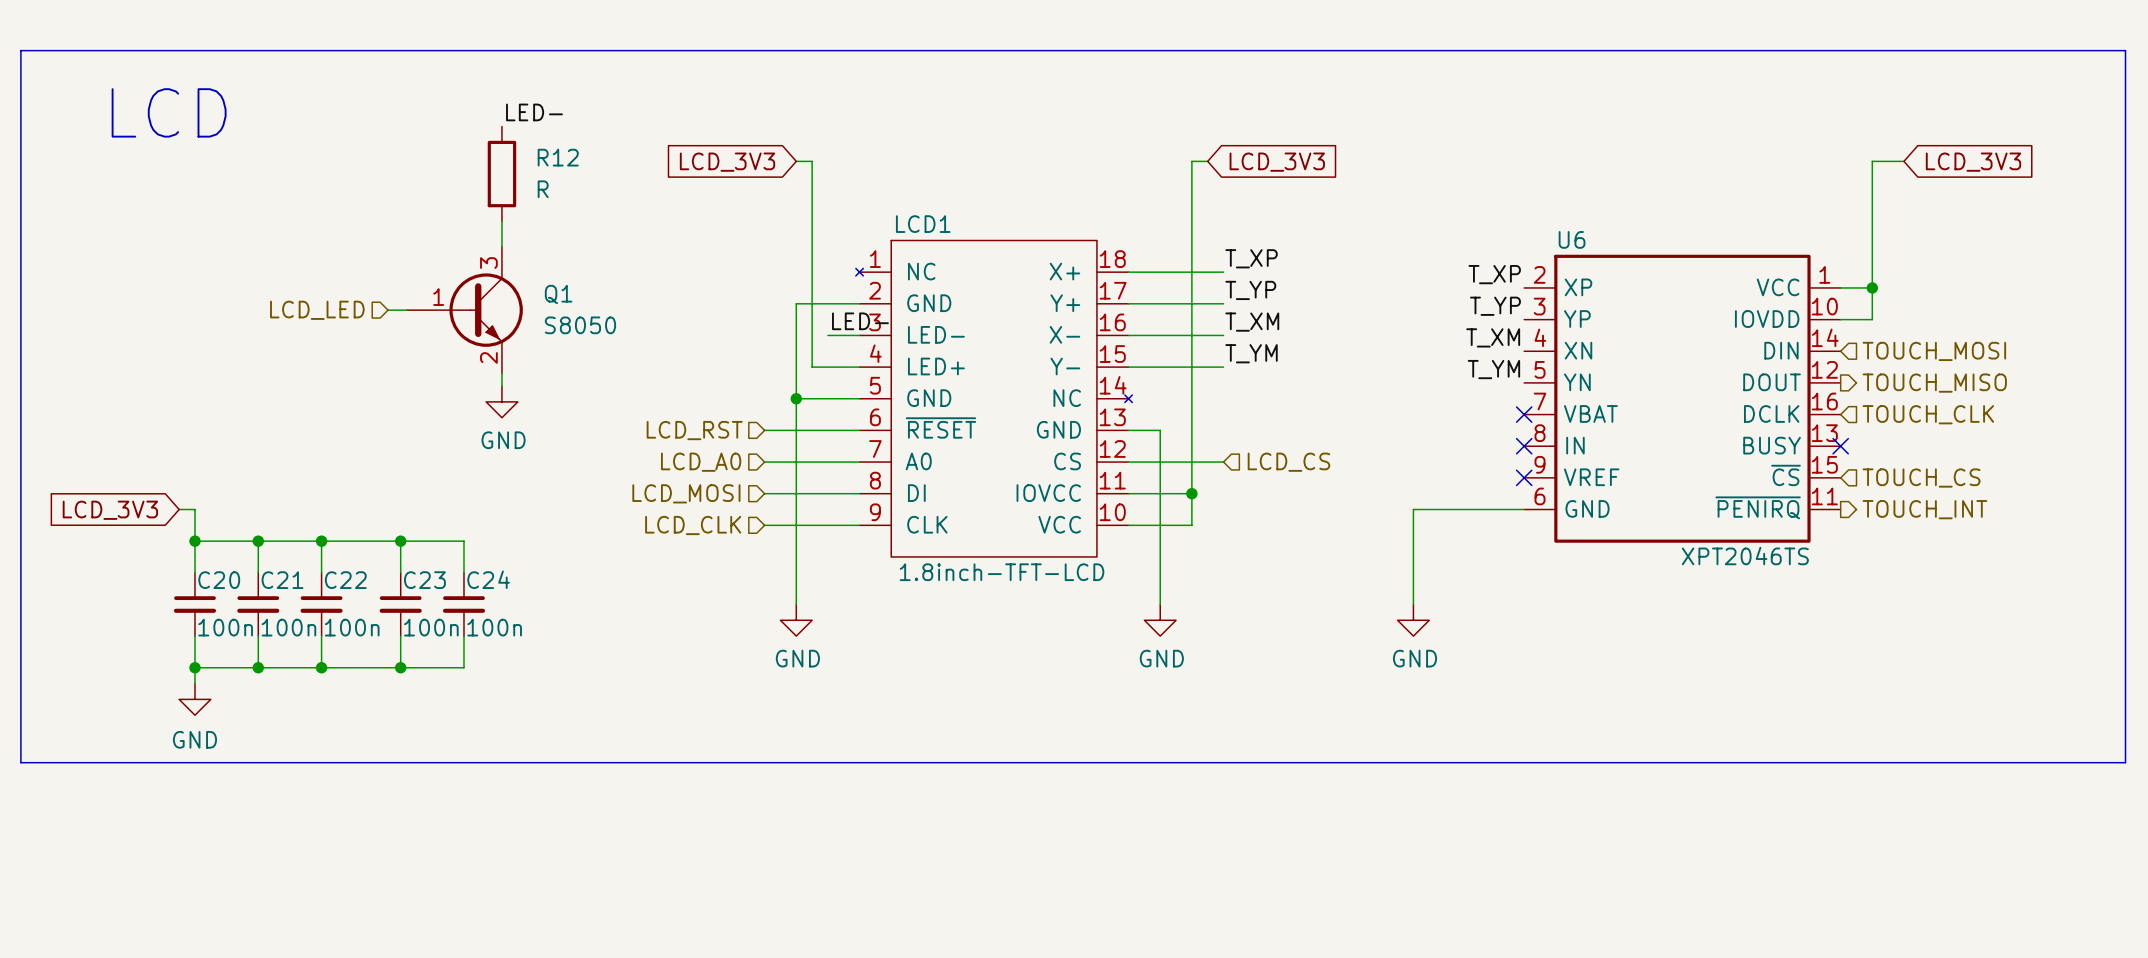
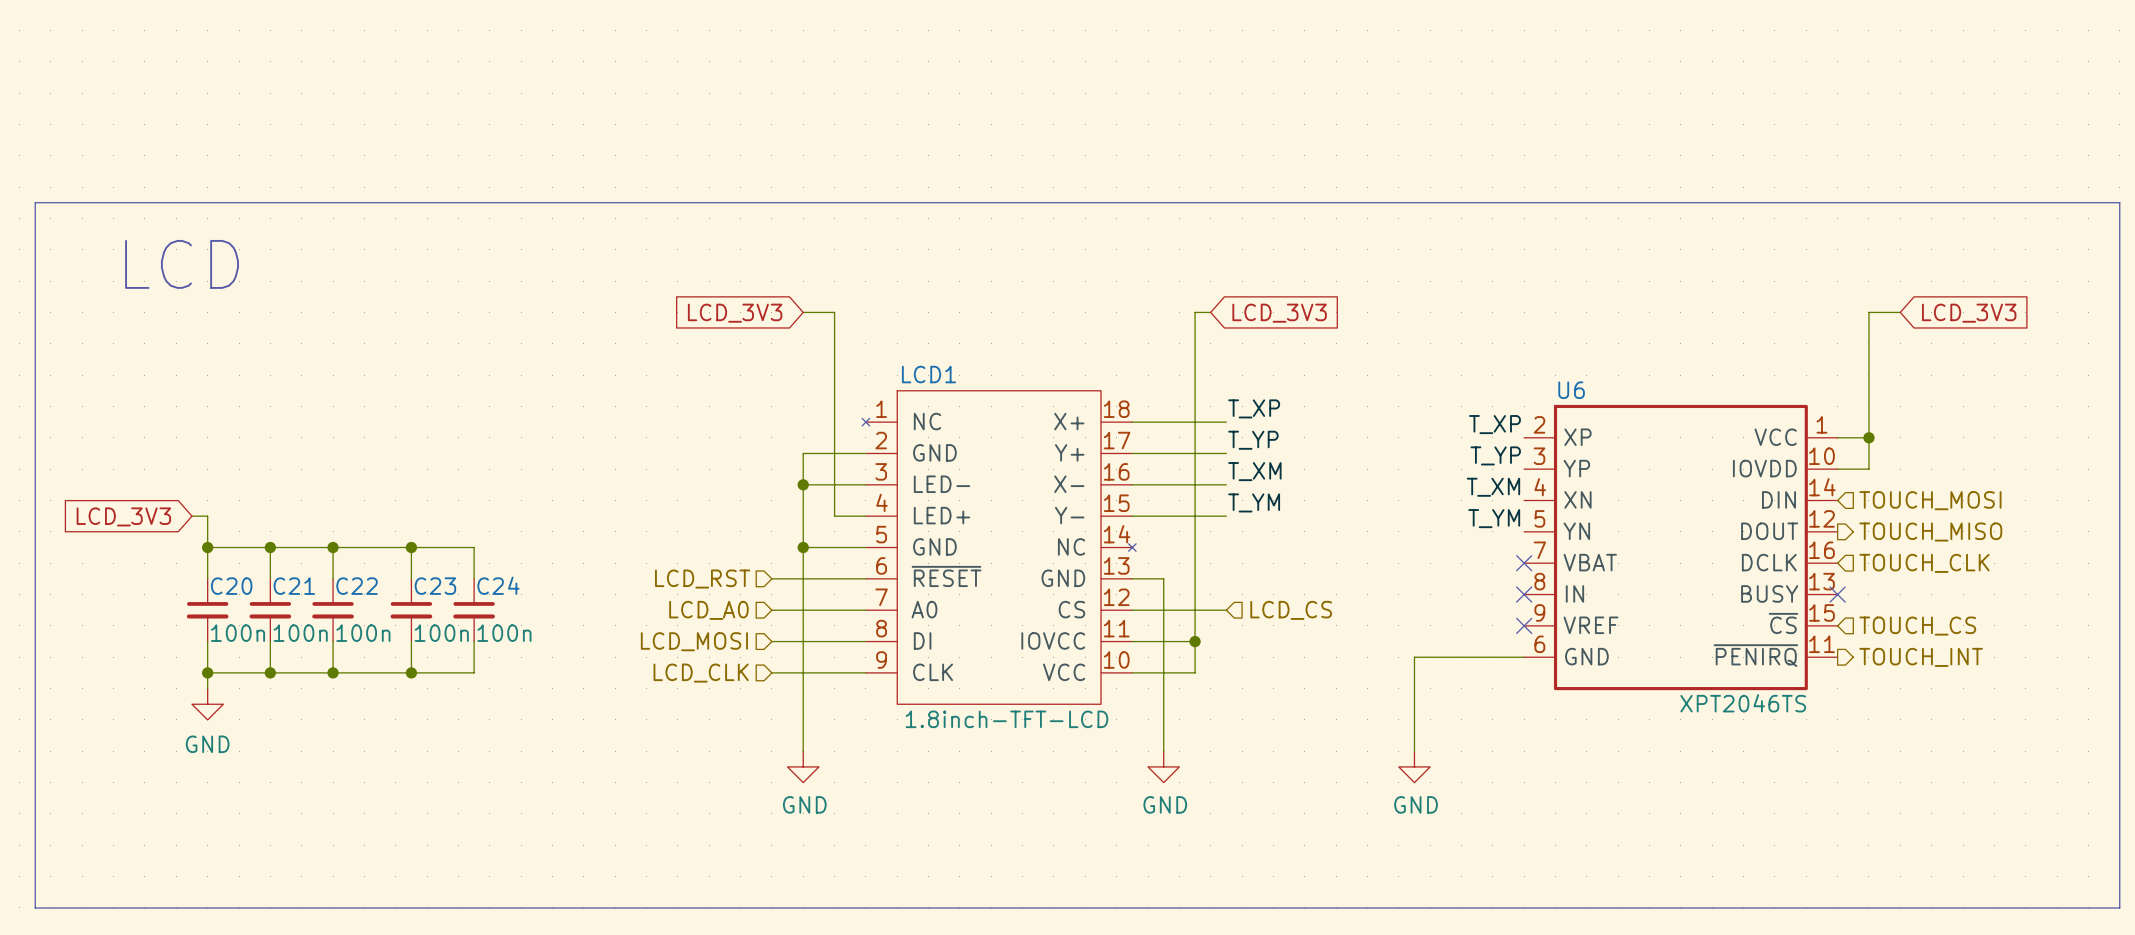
text position: LCD (169, 112) -> LCD (182, 264)
label: LED- (534, 112) -> none
wire: (796, 161) (812, 161) (812, 367) (859, 367) -> none
wire: (1207, 161) (1191, 161) (1191, 303) (1128, 303) -> none
wire: (1903, 161) (1872, 161) (1872, 303) -> (1900, 312) (1868, 312)
global label position: LCD_3V3 (727, 162) -> LCD_3V3 (735, 313)
global label position: LCD_3V3 (1277, 162) -> LCD_3V3 (1279, 313)
global label position: LCD_3V3 (1973, 162) -> LCD_3V3 (1969, 313)
R12: R (501, 174) -> none
line: (20, 193) (20, 50) (2125, 50) (2125, 193) -> (35, 202) (2119, 202)
wire: (501, 221) (501, 246) -> none
label position: T_XP (1251, 258) -> T_XP (1254, 408)
wire: (1128, 272) (1223, 272) -> (1132, 422) (1226, 422)
label position: T_XP (1494, 274) -> T_XP (1494, 424)
wire: (1840, 287) (1872, 287) -> (1837, 437) (1868, 437)
junction: (1872, 287) -> none
label position: T_YP (1250, 290) -> T_YP (1253, 440)
wire: (796, 303) (796, 446) -> (865, 453) (803, 453)
wire: (827, 303) (859, 303) -> (834, 312) (834, 516) (865, 516)
wire: (1207, 303) (1223, 303) -> none
label position: T_YP (1495, 306) -> T_YP (1495, 455)
hierarchical label: LCD_LED (317, 310) -> none
wire: (388, 310) (407, 310) -> none
Q1: S8050 (464, 310) -> none
wire: (1840, 319) (1872, 319) -> (1837, 469) (1868, 469) (1868, 328)
label: LED- (860, 321) -> none
label position: T_XM (1252, 322) -> T_XM (1254, 471)
wire: (827, 335) (859, 335) -> none
wire: (1128, 335) (1223, 335) -> (1132, 484) (1226, 484)
label position: T_XM (1493, 337) -> T_XM (1493, 487)
hierarchical label position: TOUCH_MOSI (1934, 351) -> TOUCH_MOSI (1930, 500)
label position: T_YM (1251, 353) -> T_YM (1254, 502)
wire: (1128, 367) (1223, 367) -> (1132, 516) (1226, 516)
label position: T_YM (1493, 369) -> T_YM (1494, 518)
wire: (501, 373) (501, 386) -> none
hierarchical label position: TOUCH_MISO (1934, 383) -> TOUCH_MISO (1930, 532)
wire: (796, 398) (859, 398) -> (803, 547) (865, 547)
junction: (796, 398) -> none
LCD1 position: (994, 398) -> (999, 547)
U6 position: (1682, 398) -> (1680, 547)
power symbol: GND (501, 401) -> none
no-connect mark: (1524, 414) -> none
hierarchical label position: TOUCH_CLK (1928, 414) -> TOUCH_CLK (1924, 563)
hierarchical label position: LCD_RST (694, 430) -> LCD_RST (702, 579)
wire: (764, 430) (859, 430) -> (771, 578) (865, 578)
wire: (1128, 430) (1160, 430) (1160, 572) -> (1132, 578) (1163, 578)
junction: none -> (1868, 437)
wire: none -> (1132, 453) (1226, 453)
no-connect mark: (1524, 446) -> none
no-connect mark: (1840, 446) -> none
hierarchical label position: LCD_A0 (701, 462) -> LCD_A0 (708, 610)
wire: (764, 462) (859, 462) -> (771, 610) (865, 610)
wire: (1128, 462) (1223, 462) -> (1132, 610) (1226, 610)
hierarchical label position: LCD_CS (1288, 462) -> LCD_CS (1291, 610)
wire: none -> (803, 484) (865, 484)
junction: none -> (803, 484)
no-connect mark: (1524, 477) -> none
hierarchical label position: TOUCH_CS (1921, 478) -> TOUCH_CS (1917, 626)
hierarchical label position: LCD_MOSI (686, 493) -> LCD_MOSI (694, 641)
wire: (764, 493) (859, 493) -> (771, 641) (865, 641)
wire: (1128, 493) (1191, 493) -> (1132, 641) (1195, 641)
junction: (1191, 493) -> none
wire: (1524, 509) (1413, 509) (1413, 604) -> (1524, 657) (1414, 657) (1414, 751)
hierarchical label position: TOUCH_INT (1924, 509) -> TOUCH_INT (1921, 657)
hierarchical label position: LCD_CLK (693, 525) -> LCD_CLK (701, 673)
wire: (764, 525) (859, 525) -> (771, 672) (865, 672)
wire: (1128, 525) (1191, 525) -> (1132, 672) (1195, 672) (1195, 531)
junction: none -> (803, 547)
no-connect mark: none -> (1524, 563)
no-connect mark: none -> (1524, 594)
no-connect mark: none -> (1837, 594)
wire: none -> (803, 610) (803, 751)
wire: none -> (1163, 610) (1163, 751)
power symbol position: GND (796, 620) -> GND (803, 766)
power symbol position: GND (1160, 620) -> GND (1163, 766)
power symbol position: GND (1413, 620) -> GND (1414, 766)
no-connect mark: none -> (1524, 625)
junction: none -> (1195, 641)
line: (20, 762) (2125, 762) -> (35, 766) (35, 907) (2119, 907) (2119, 766)

